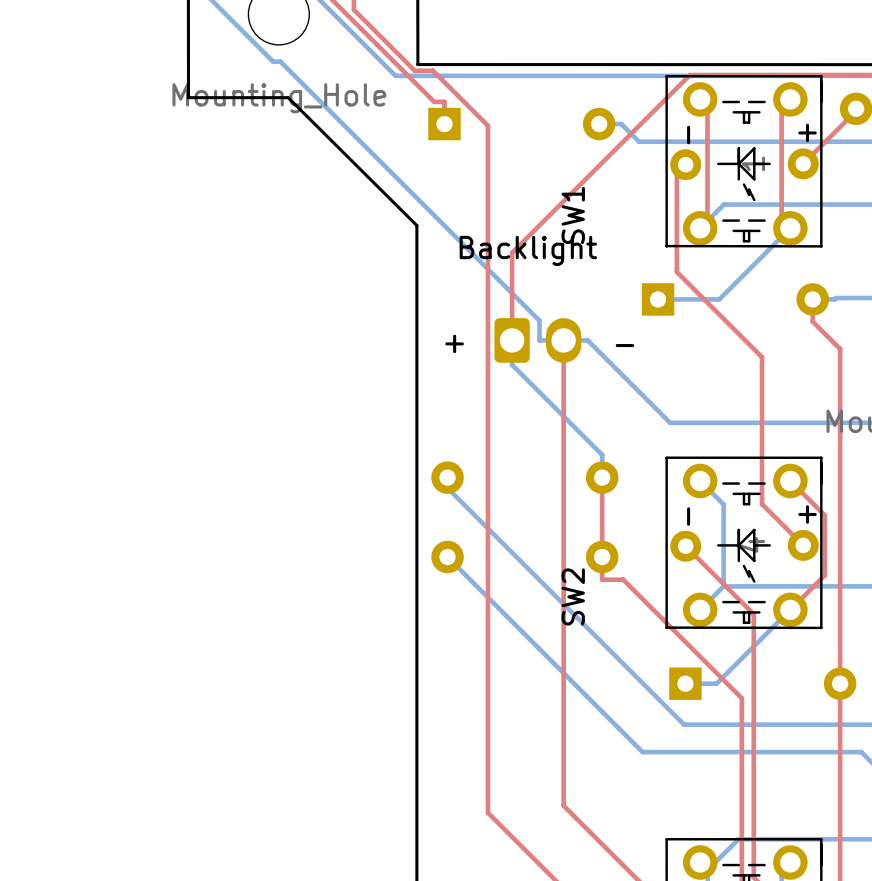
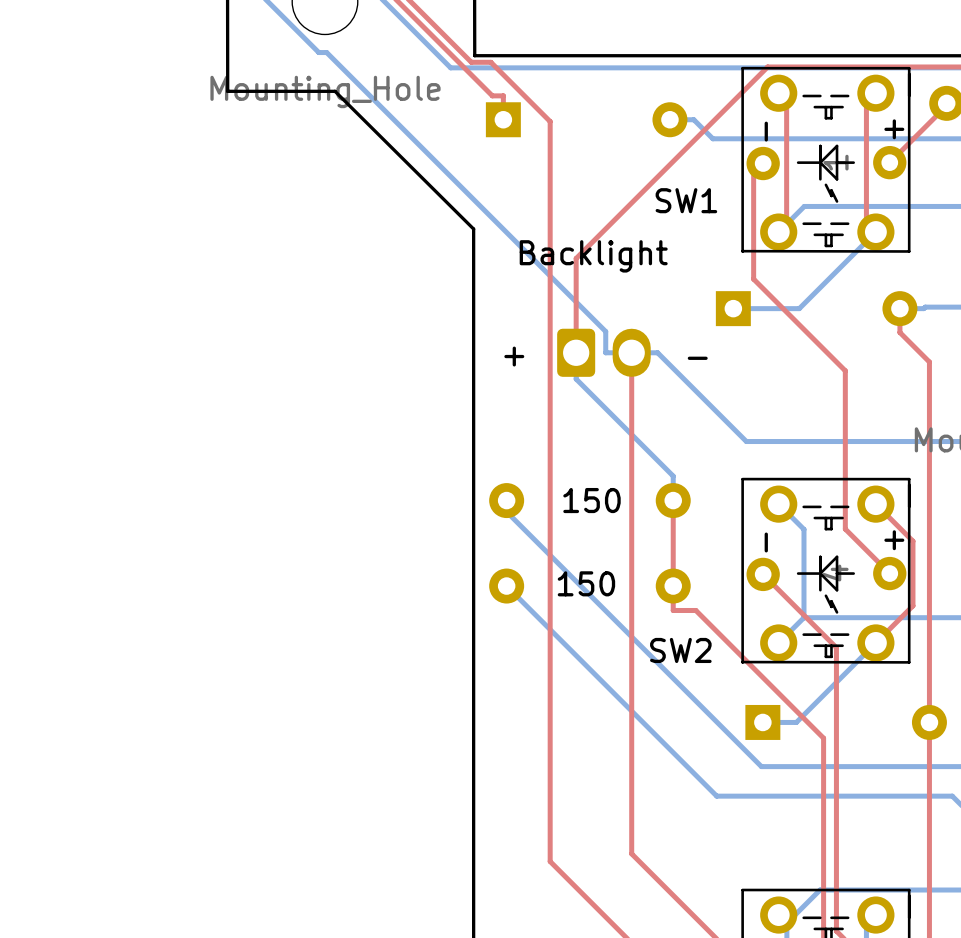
SW1 name rotation: 0° (573, 215) -> 90° clockwise (686, 200)
text: none -> 150 (592, 500)
text: none -> 150 (586, 583)
SW2 name rotation: 0° (573, 596) -> 90° clockwise (680, 650)

